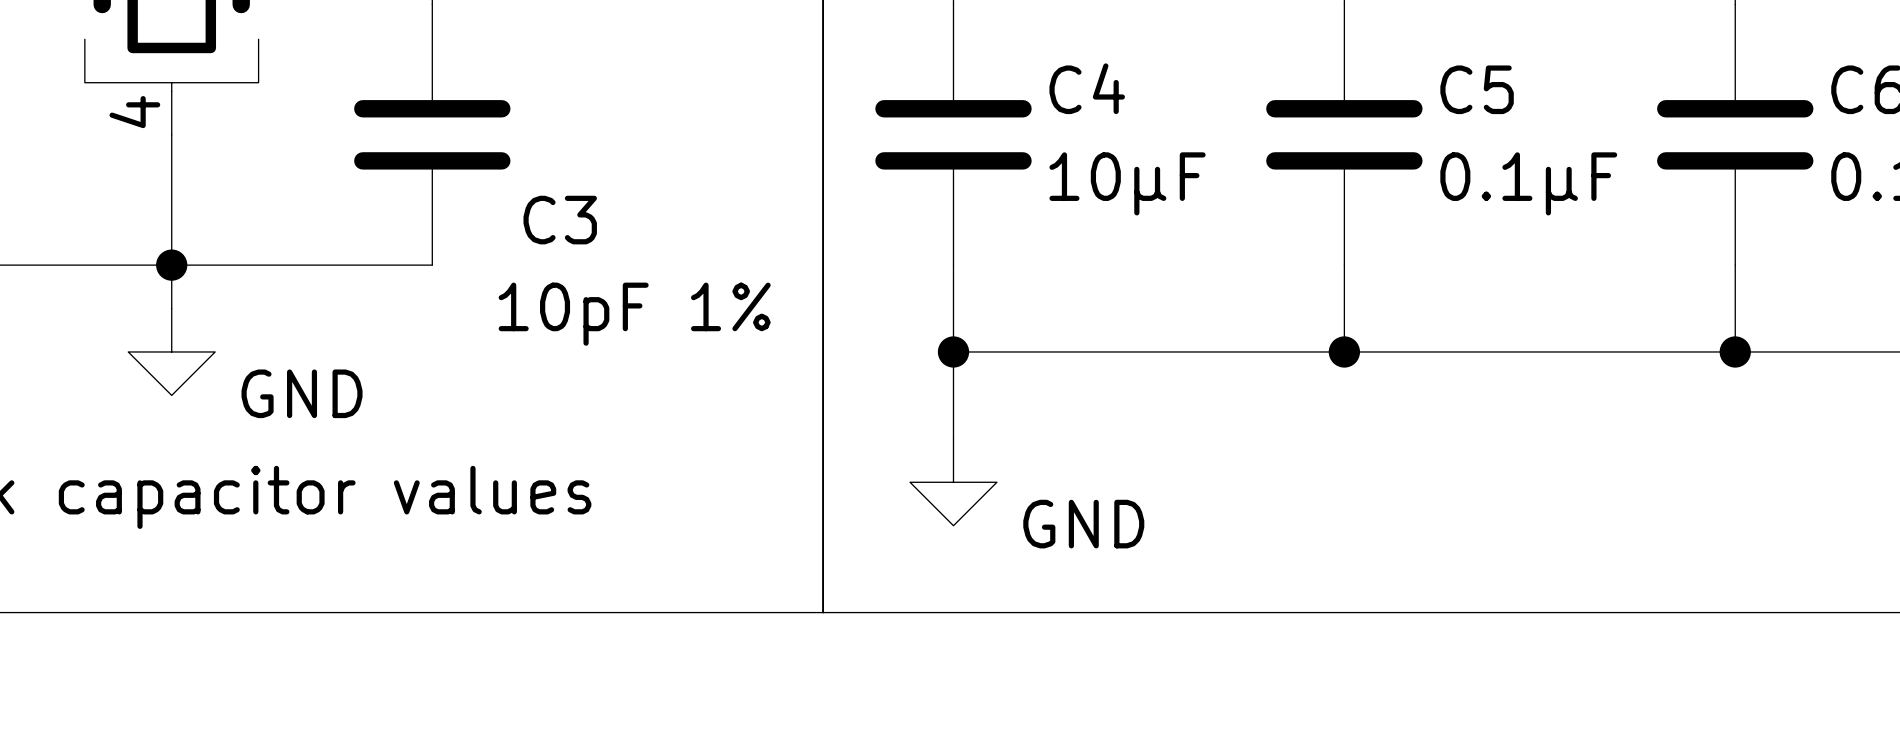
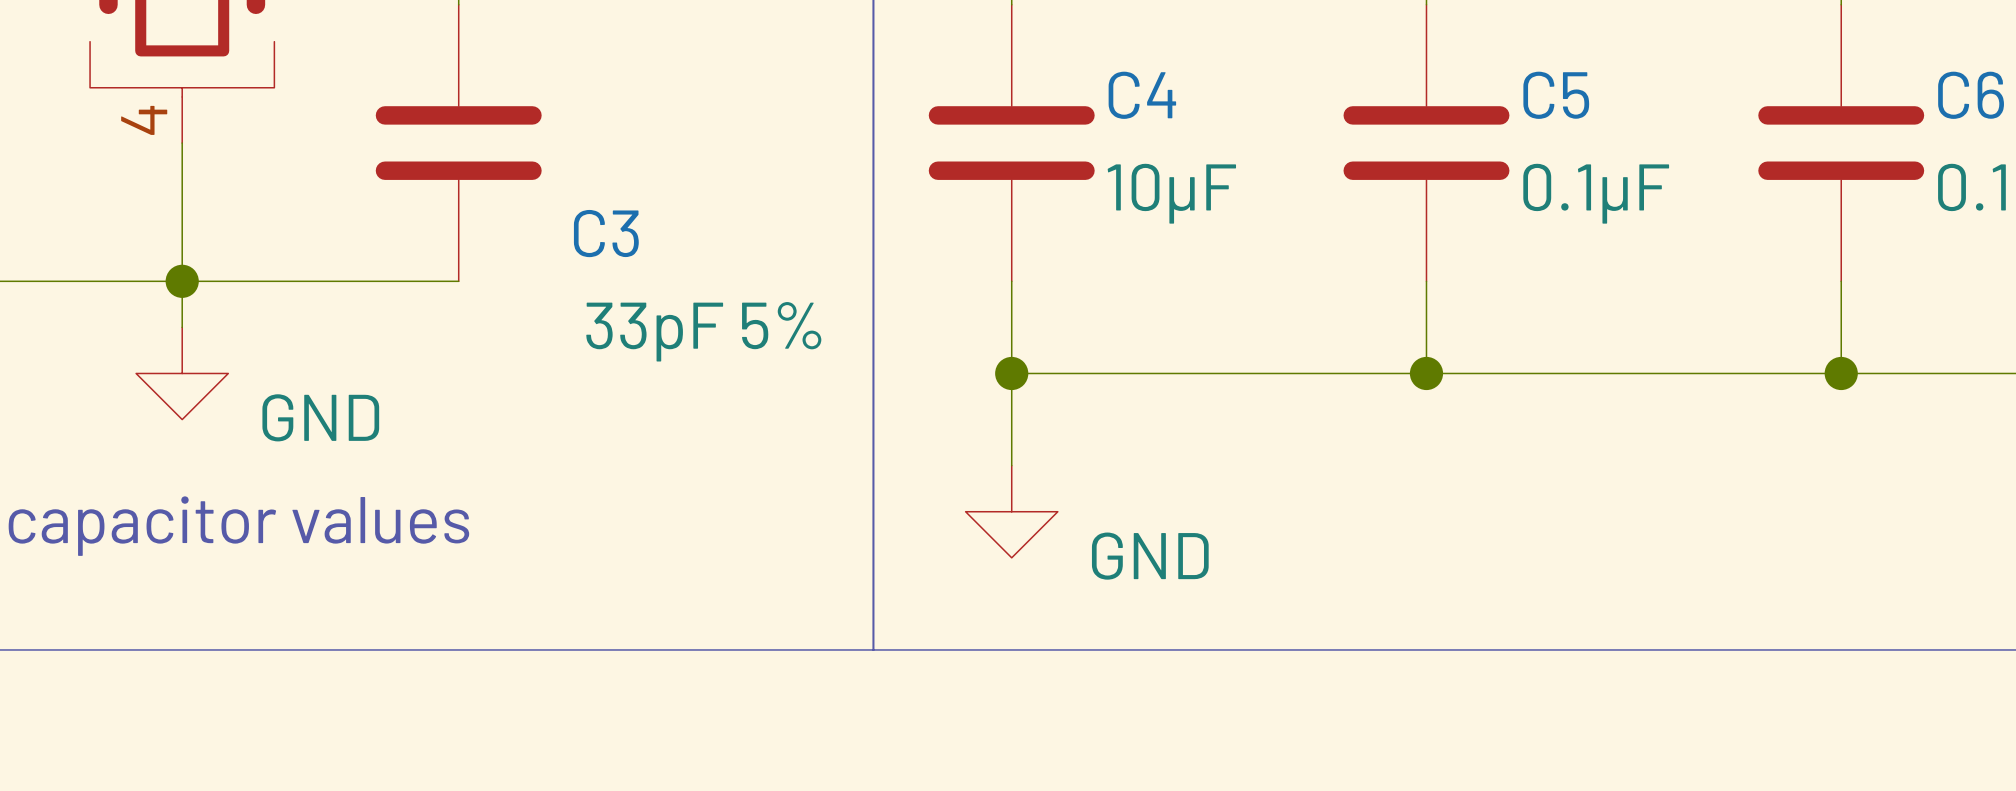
C3 value: 10pF 1% (634, 314) -> 33pF 5% (703, 331)

